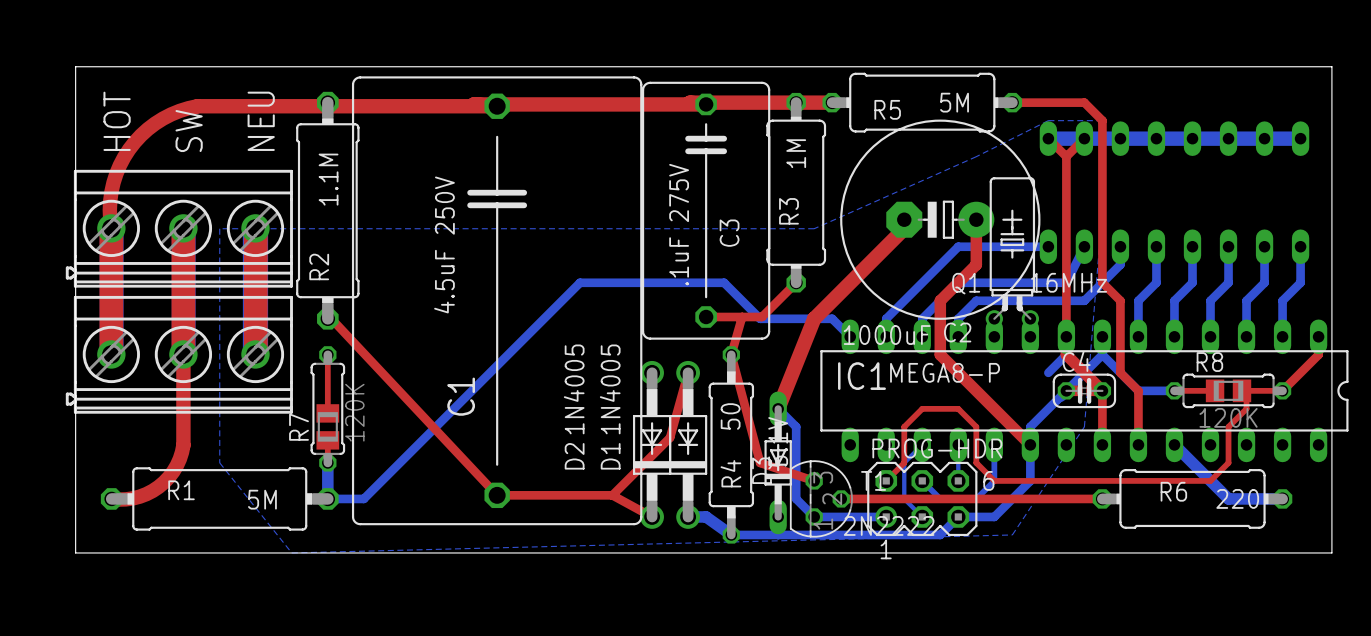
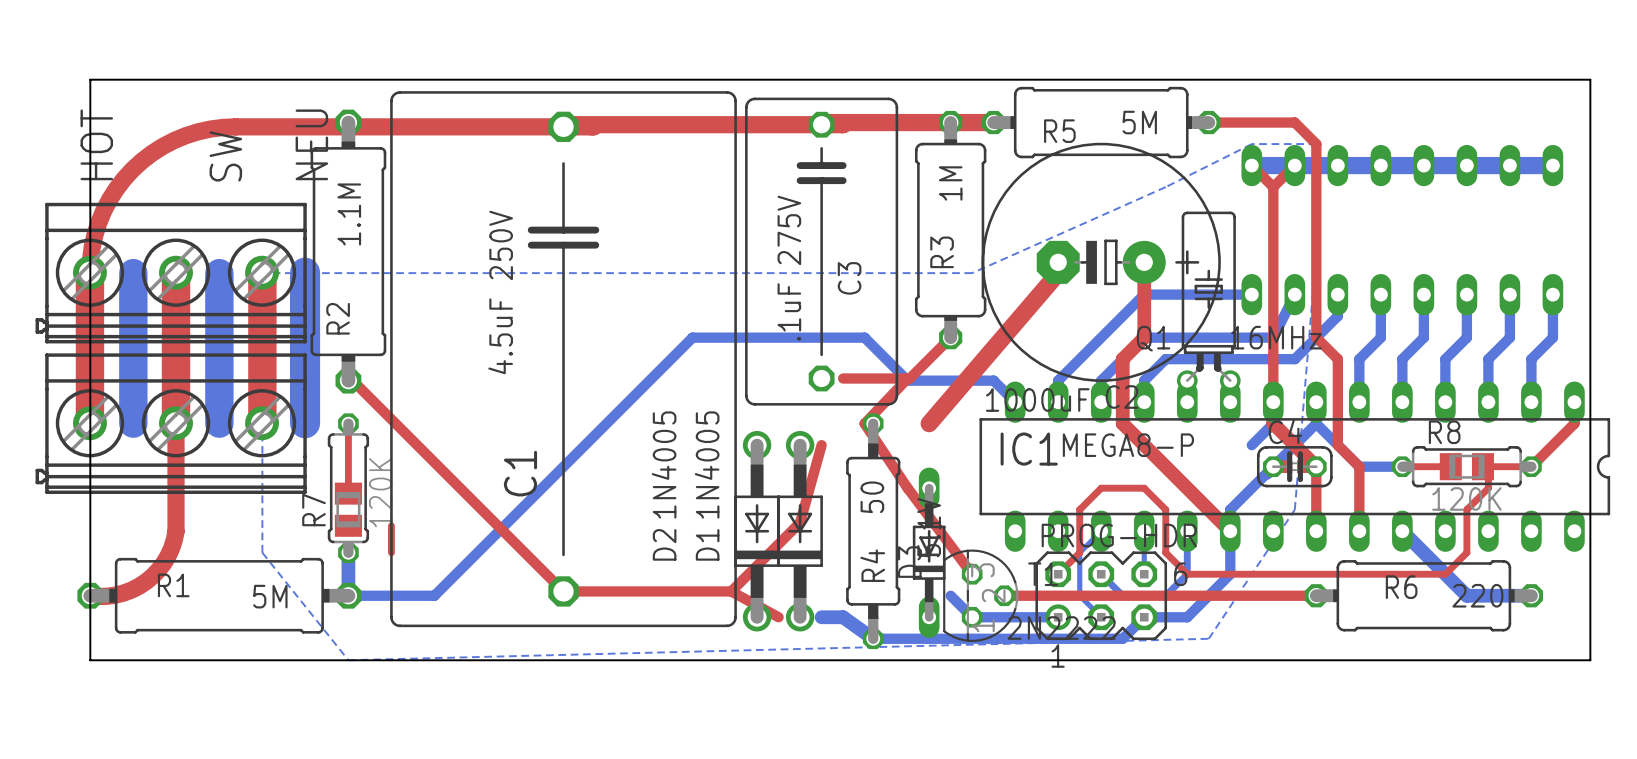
top track: (197, 106) (171, 114) (147, 129) (129, 149) (116, 173) (111, 191) (109, 210) (111, 354) -> (235, 126) (198, 131) (162, 146) (142, 160) (124, 178) (103, 211) (94, 234) (90, 259) (89, 423)
text position: HOT (117, 121) -> HOT (96, 144)
R2 position: (327, 210) -> (348, 251)
C3 position: (706, 210) -> (821, 251)
C2 position: (940, 219) -> (1101, 262)
top track: (976, 219) (976, 264) (958, 282) -> (1144, 262) (1144, 337)
part position: (179, 228) -> (171, 273)
top track: (183, 228) (182, 452) (173, 471) (164, 482) (152, 490) (132, 498) (111, 498) -> (175, 272) (175, 531) (174, 539) (168, 555) (158, 569) (139, 586) (115, 595) (90, 595)
top track: (255, 228) (255, 354) -> (262, 273) (262, 423)
top track: none -> (1058, 273) (929, 423)
top track: (904, 228) (814, 318) (778, 408) -> none
C1 position: (497, 300) -> (563, 359)
top track: (742, 317) (731, 354) (760, 462) (814, 480) -> (907, 378) (864, 423) (907, 488) (972, 574)
top track: (327, 318) (331, 318) (497, 495) -> (348, 380) (352, 380) (563, 591) (593, 591)
part position: (179, 354) -> (171, 423)
top track: (327, 354) (327, 413) -> (348, 423) (348, 493)
R7 position: (327, 408) -> (348, 488)
bottom track: (778, 408) (796, 426) (796, 498) -> none
part position: (327, 426) -> (348, 509)
D2 position: (652, 444) -> (757, 531)
D1 position: (688, 444) -> (800, 531)
bottom track: (327, 462) (327, 498) -> (348, 552) (348, 595) (391, 595)
R1 position: (219, 498) -> (219, 595)

